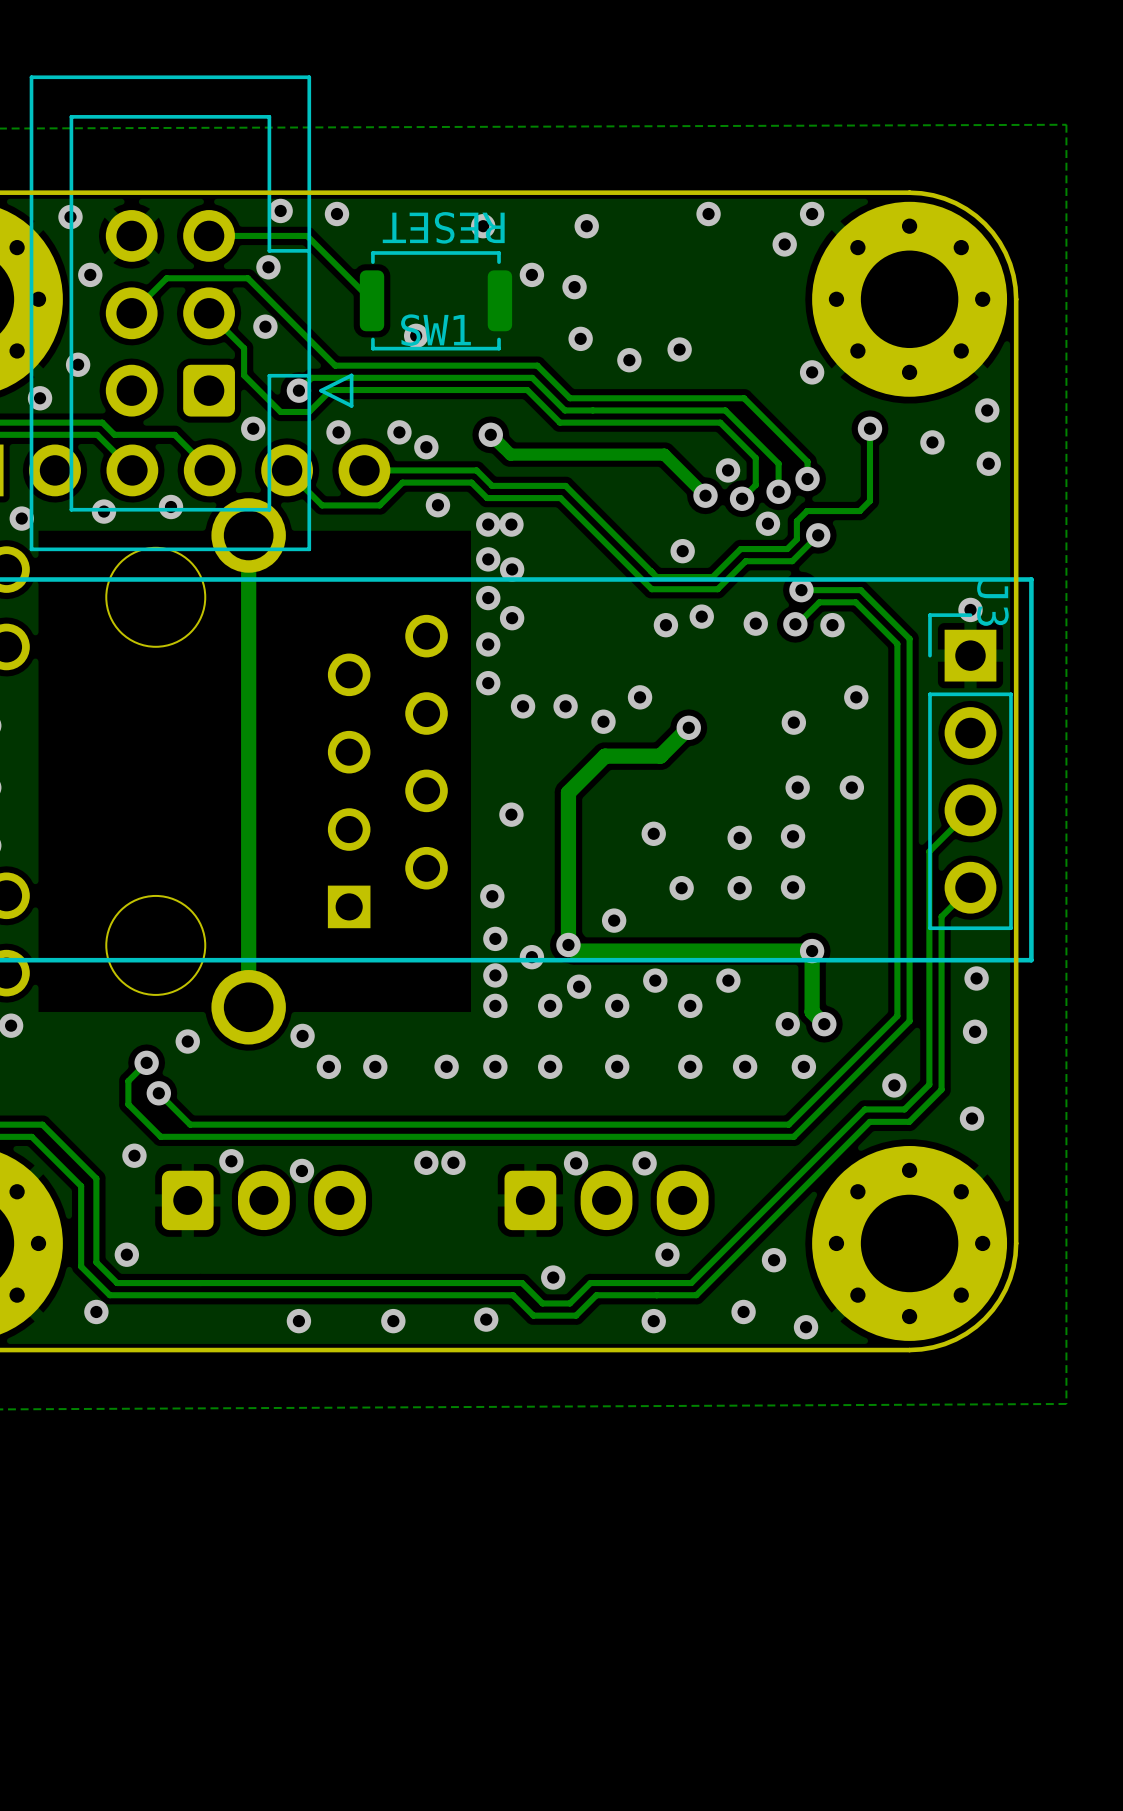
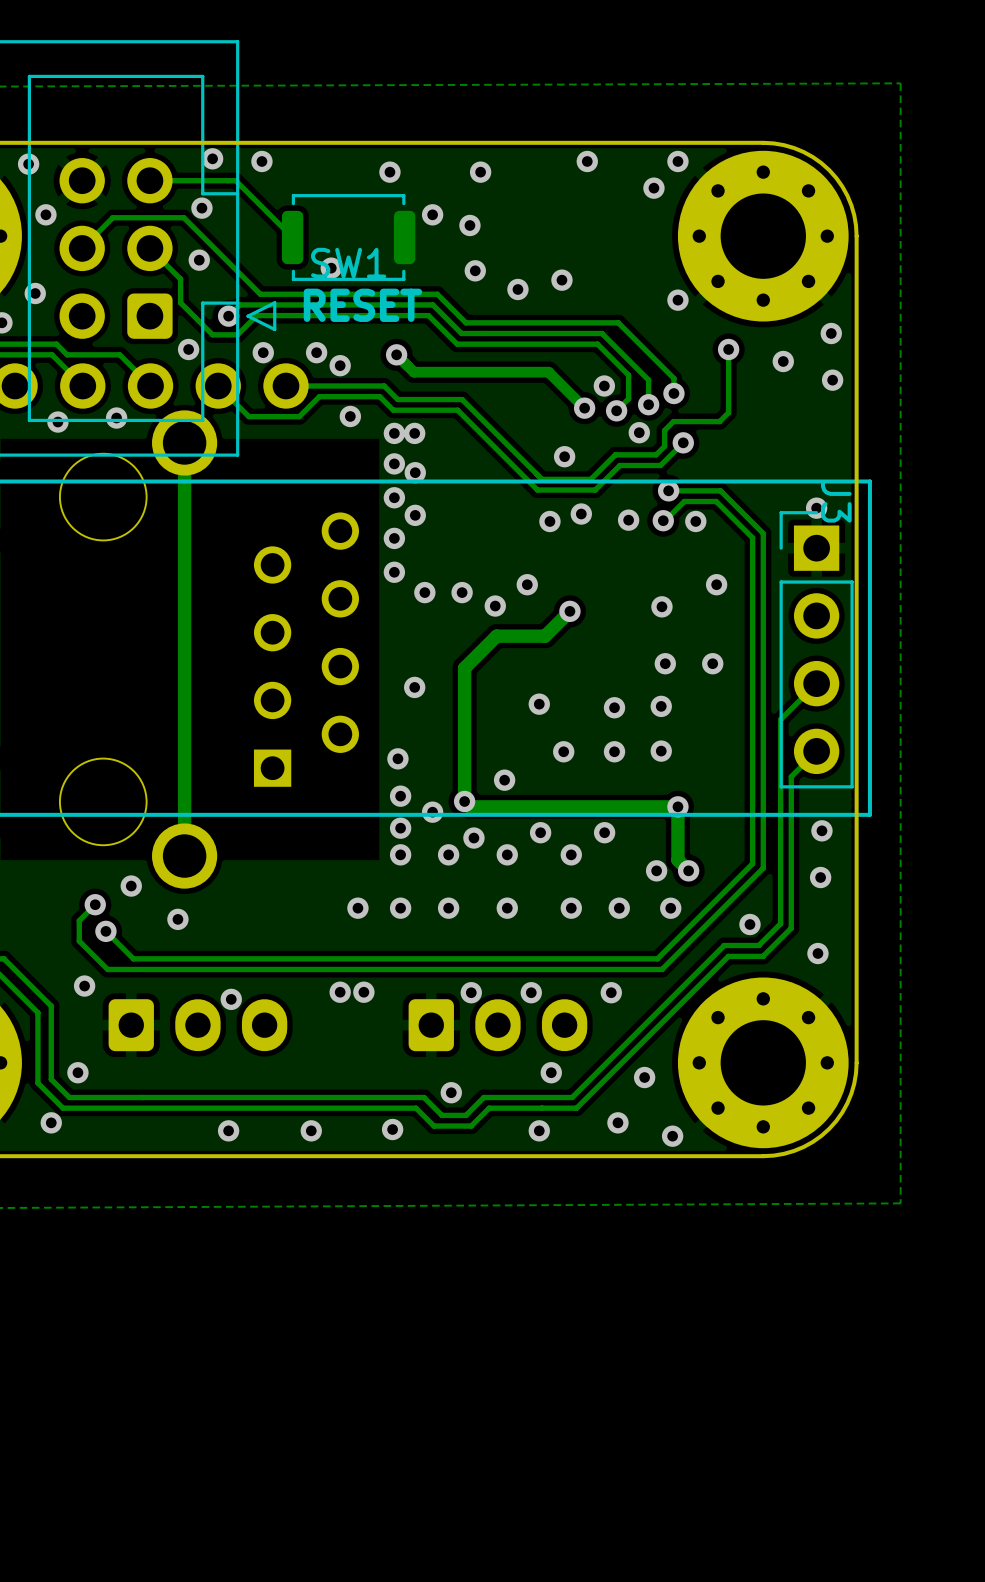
text rotation: 0° (443, 227) -> 180° (362, 305)
via: (302, 1035) -> none
via: (328, 1066) -> none
via: (375, 1066) -> none
via: none -> (177, 919)
via: (231, 1161) -> none
via: none -> (611, 992)

